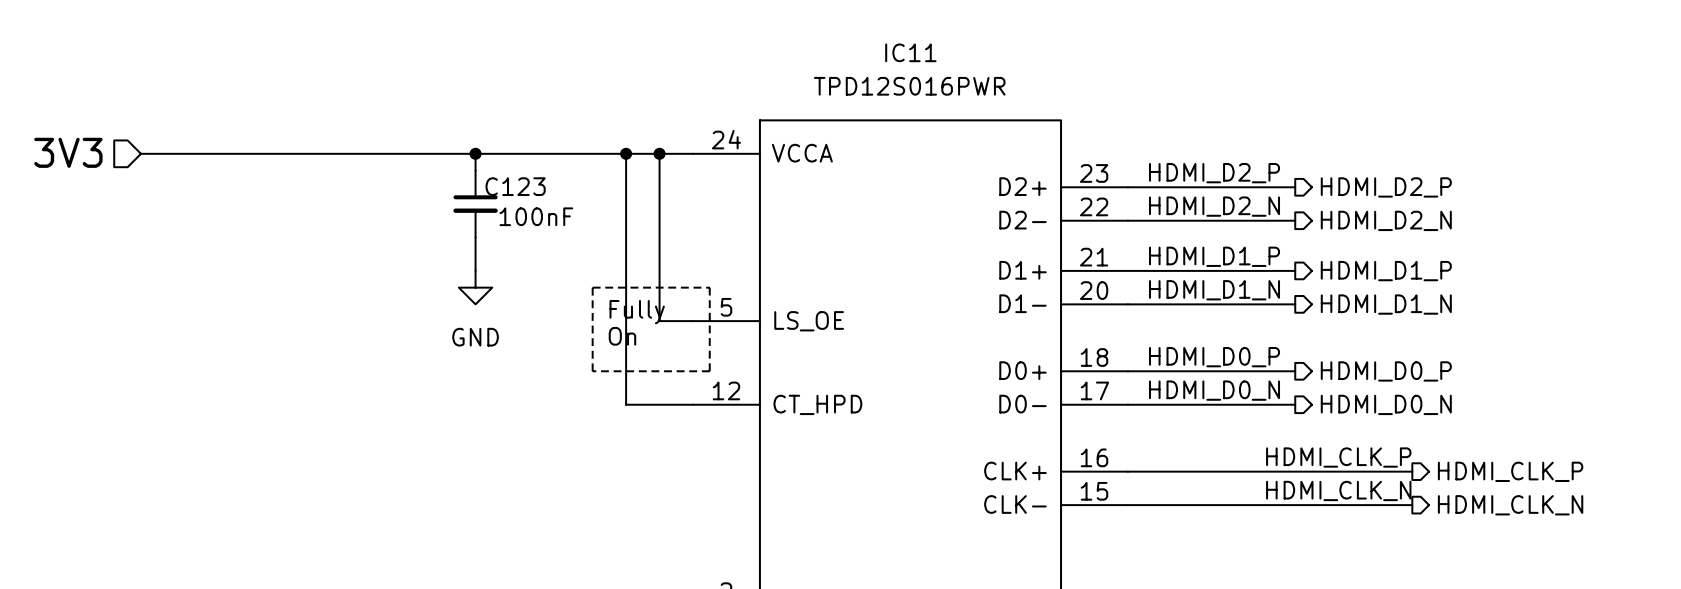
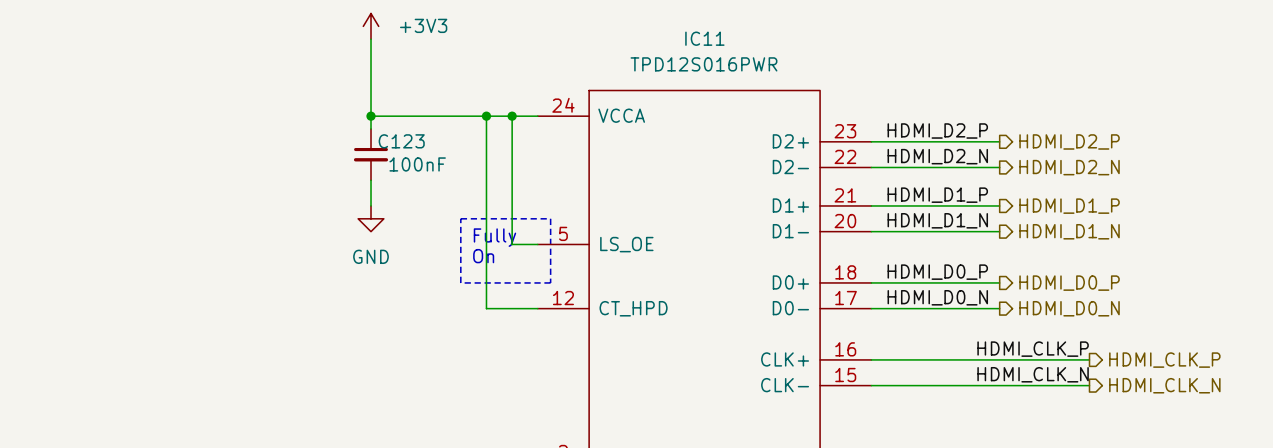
power symbol: none -> +3V3 (371, 26)
hierarchical label: 3V3 (68, 152) -> none
wire: (141, 153) (475, 153) -> (371, 39) (371, 116)

